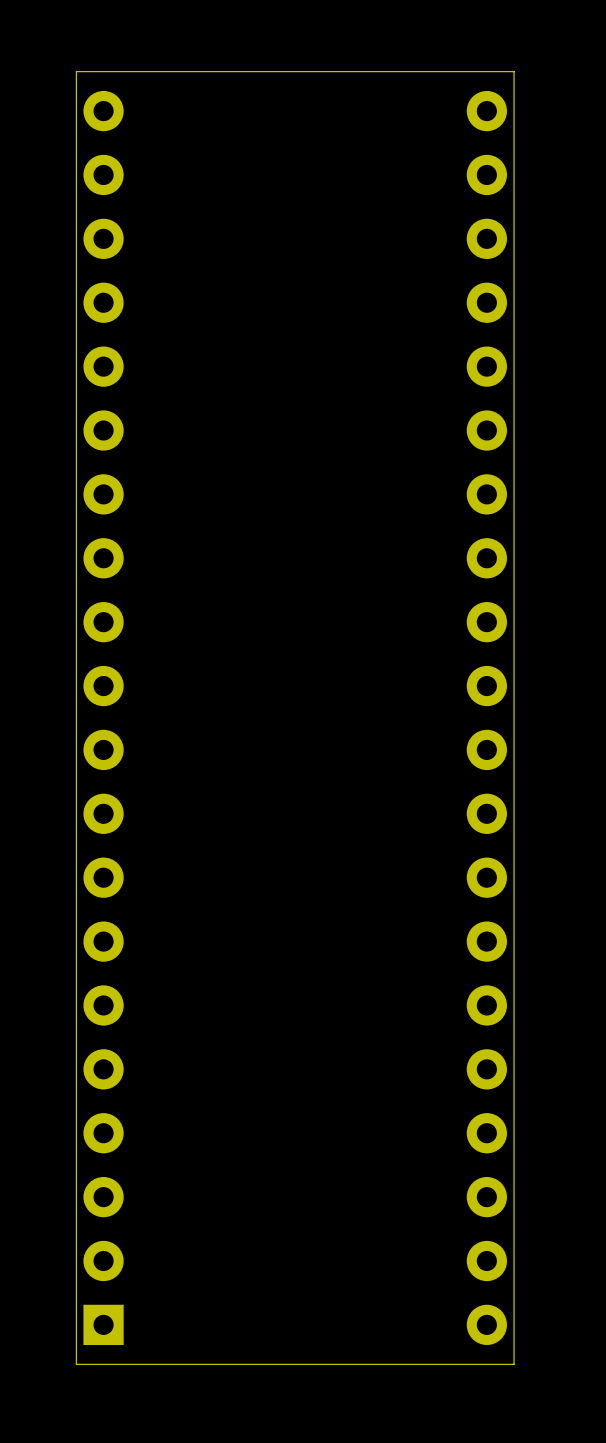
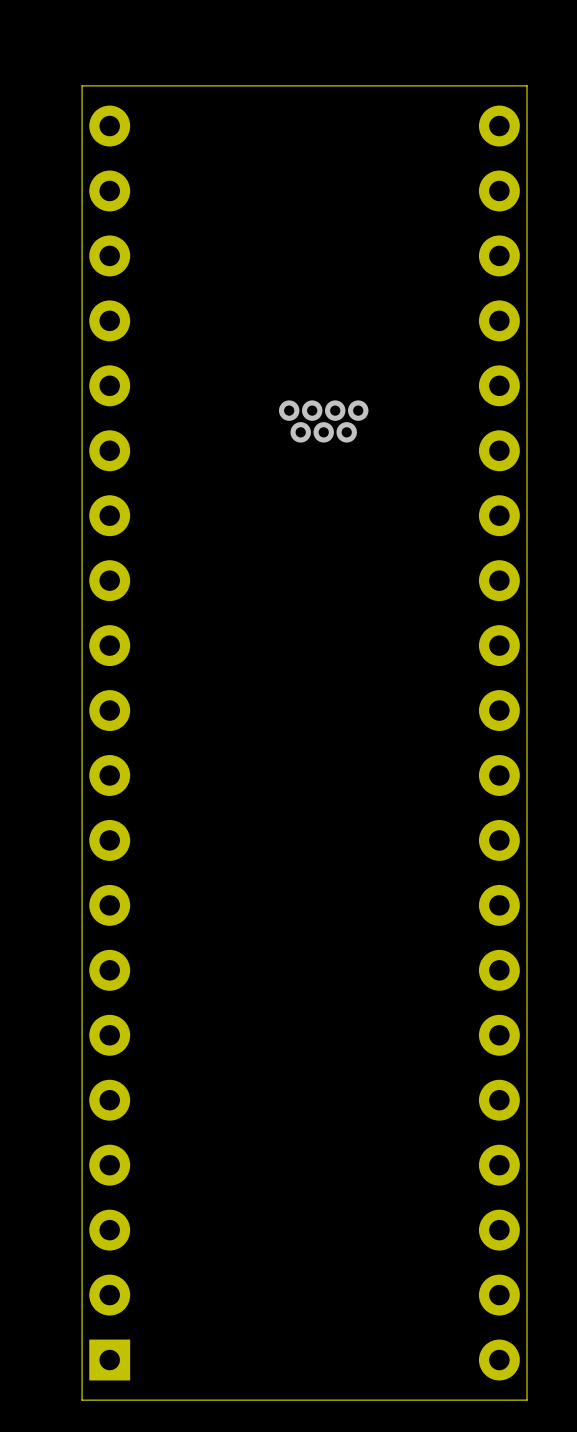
via: none -> (289, 410)
via: none -> (312, 410)
via: none -> (335, 410)
via: none -> (358, 410)
via: none -> (300, 432)
via: none -> (323, 432)
via: none -> (346, 432)

